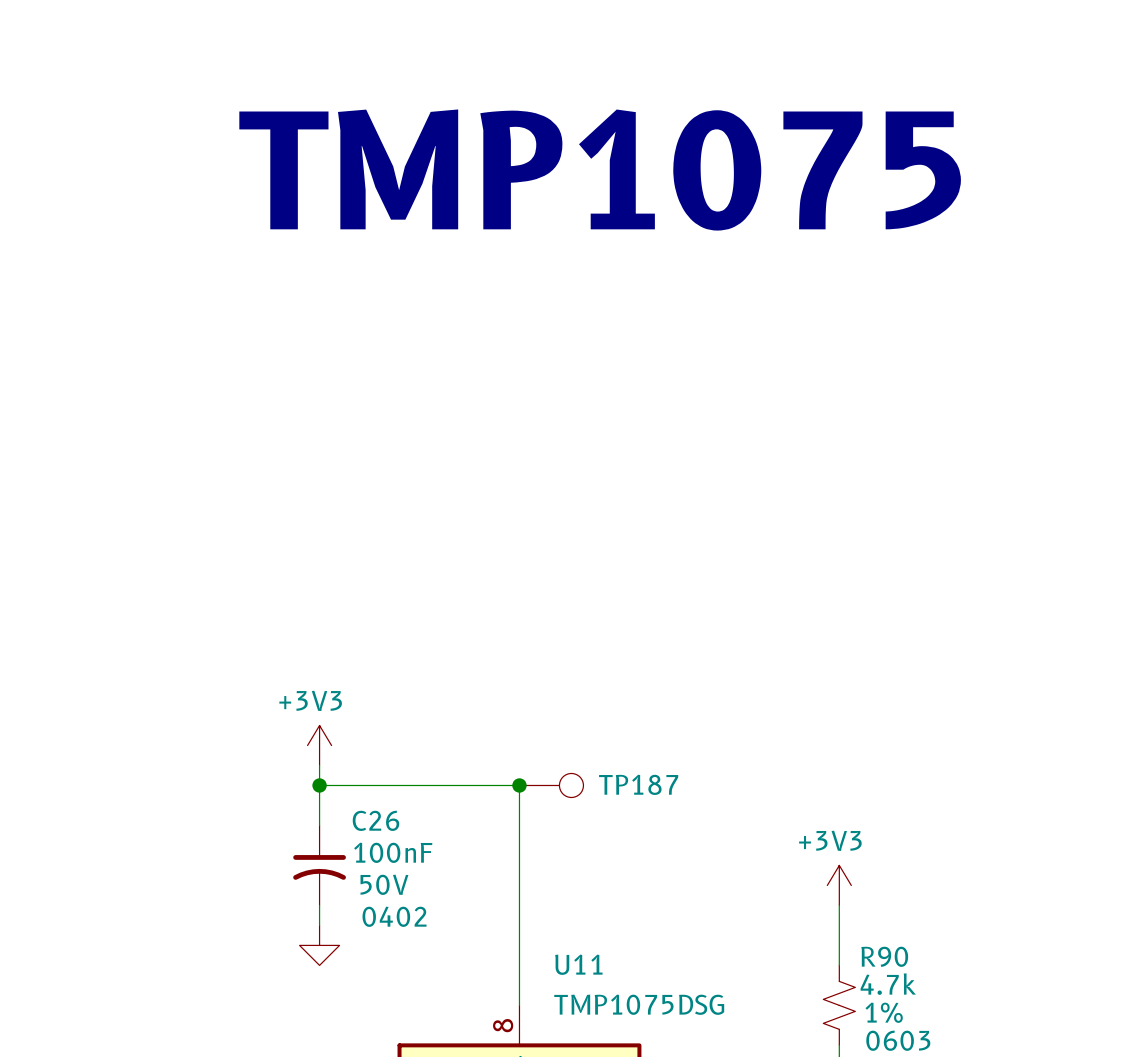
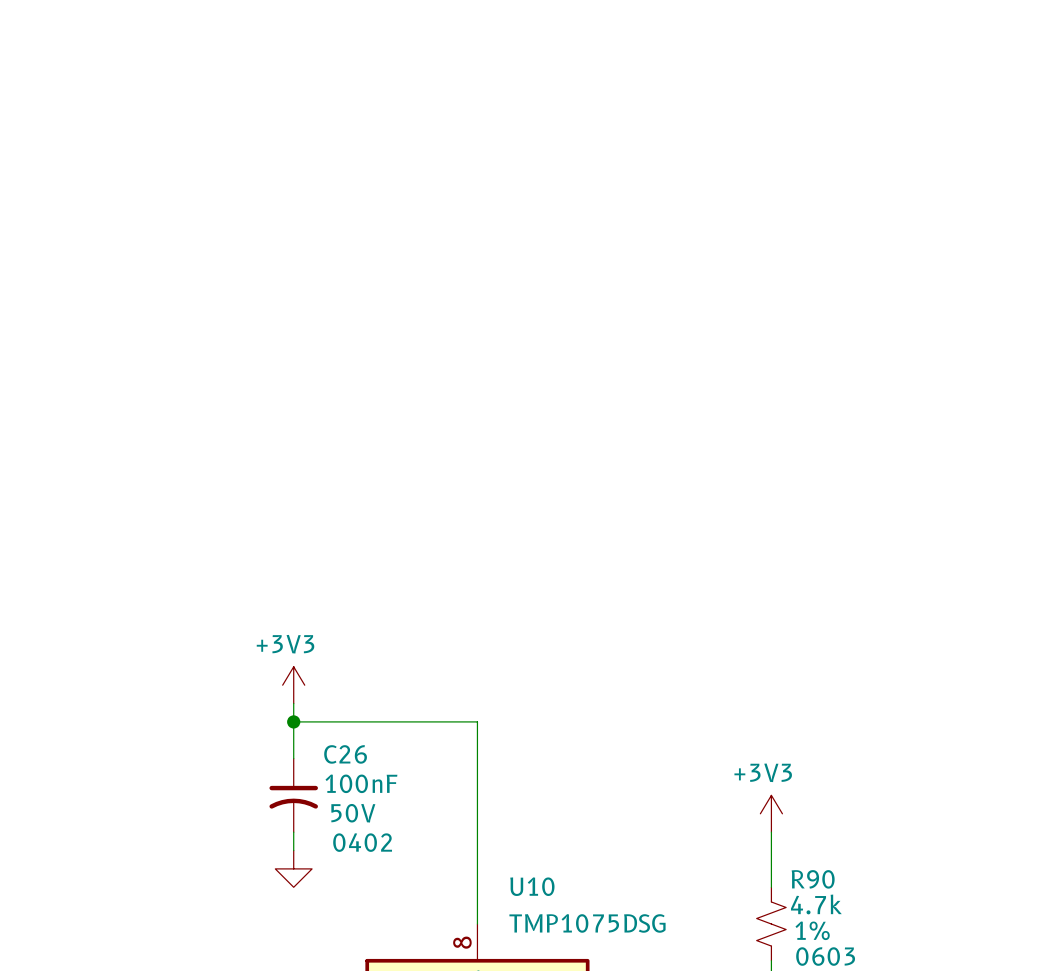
text: TMP1075 (600, 170) -> none
junction: (519, 785) -> none
TP187: (551, 785) -> none
U11 name: U11 (578, 964) -> U10 (532, 886)

